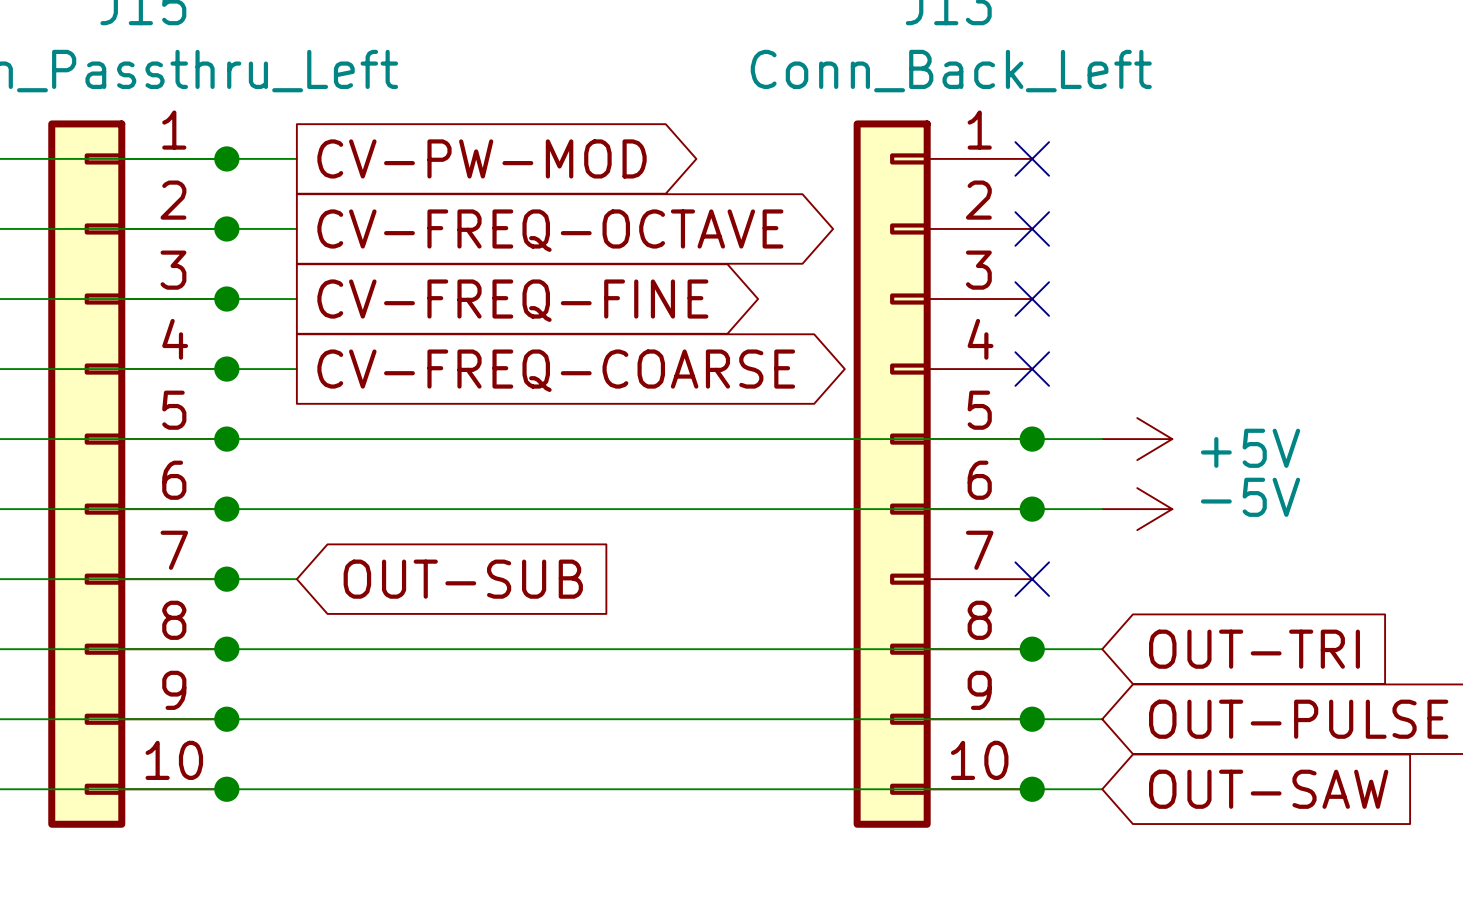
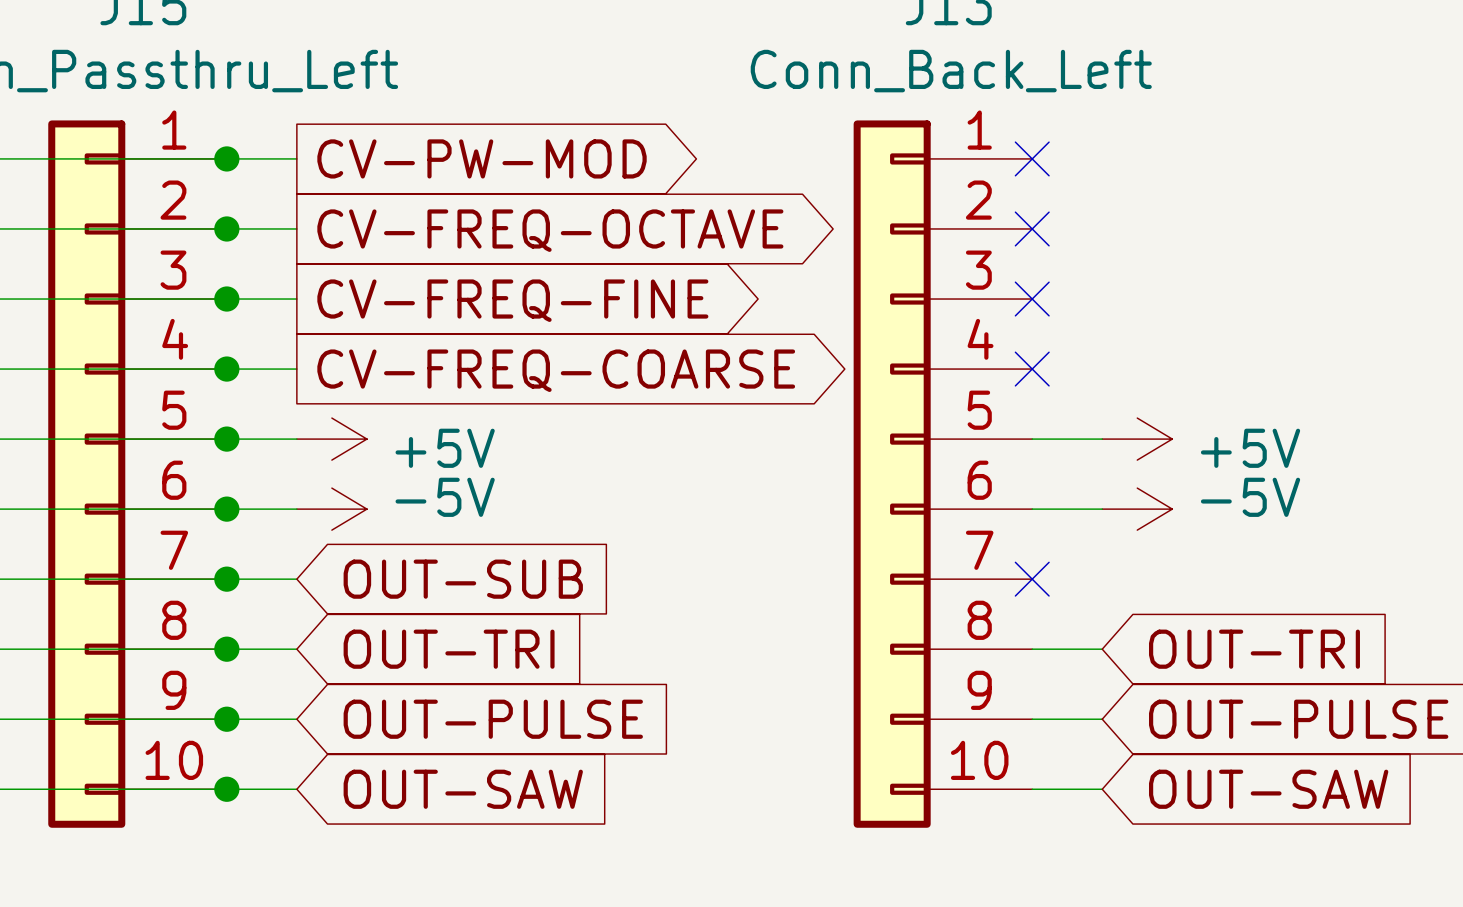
wire: (296, 439) (1032, 439) -> none
power symbol: none -> +5V (331, 439)
junction: (1032, 439) -> none
wire: (296, 509) (1032, 509) -> none
power symbol: none -> -5V (331, 509)
junction: (1032, 509) -> none
wire: (296, 649) (1032, 649) -> none
global label: none -> OUT-TRI (449, 649)
junction: (1032, 649) -> none
wire: (296, 719) (1032, 719) -> none
global label: none -> OUT-PULSE (493, 719)
junction: (1032, 719) -> none
wire: (296, 789) (1032, 789) -> none
global label: none -> OUT-SAW (463, 789)
junction: (1032, 789) -> none

